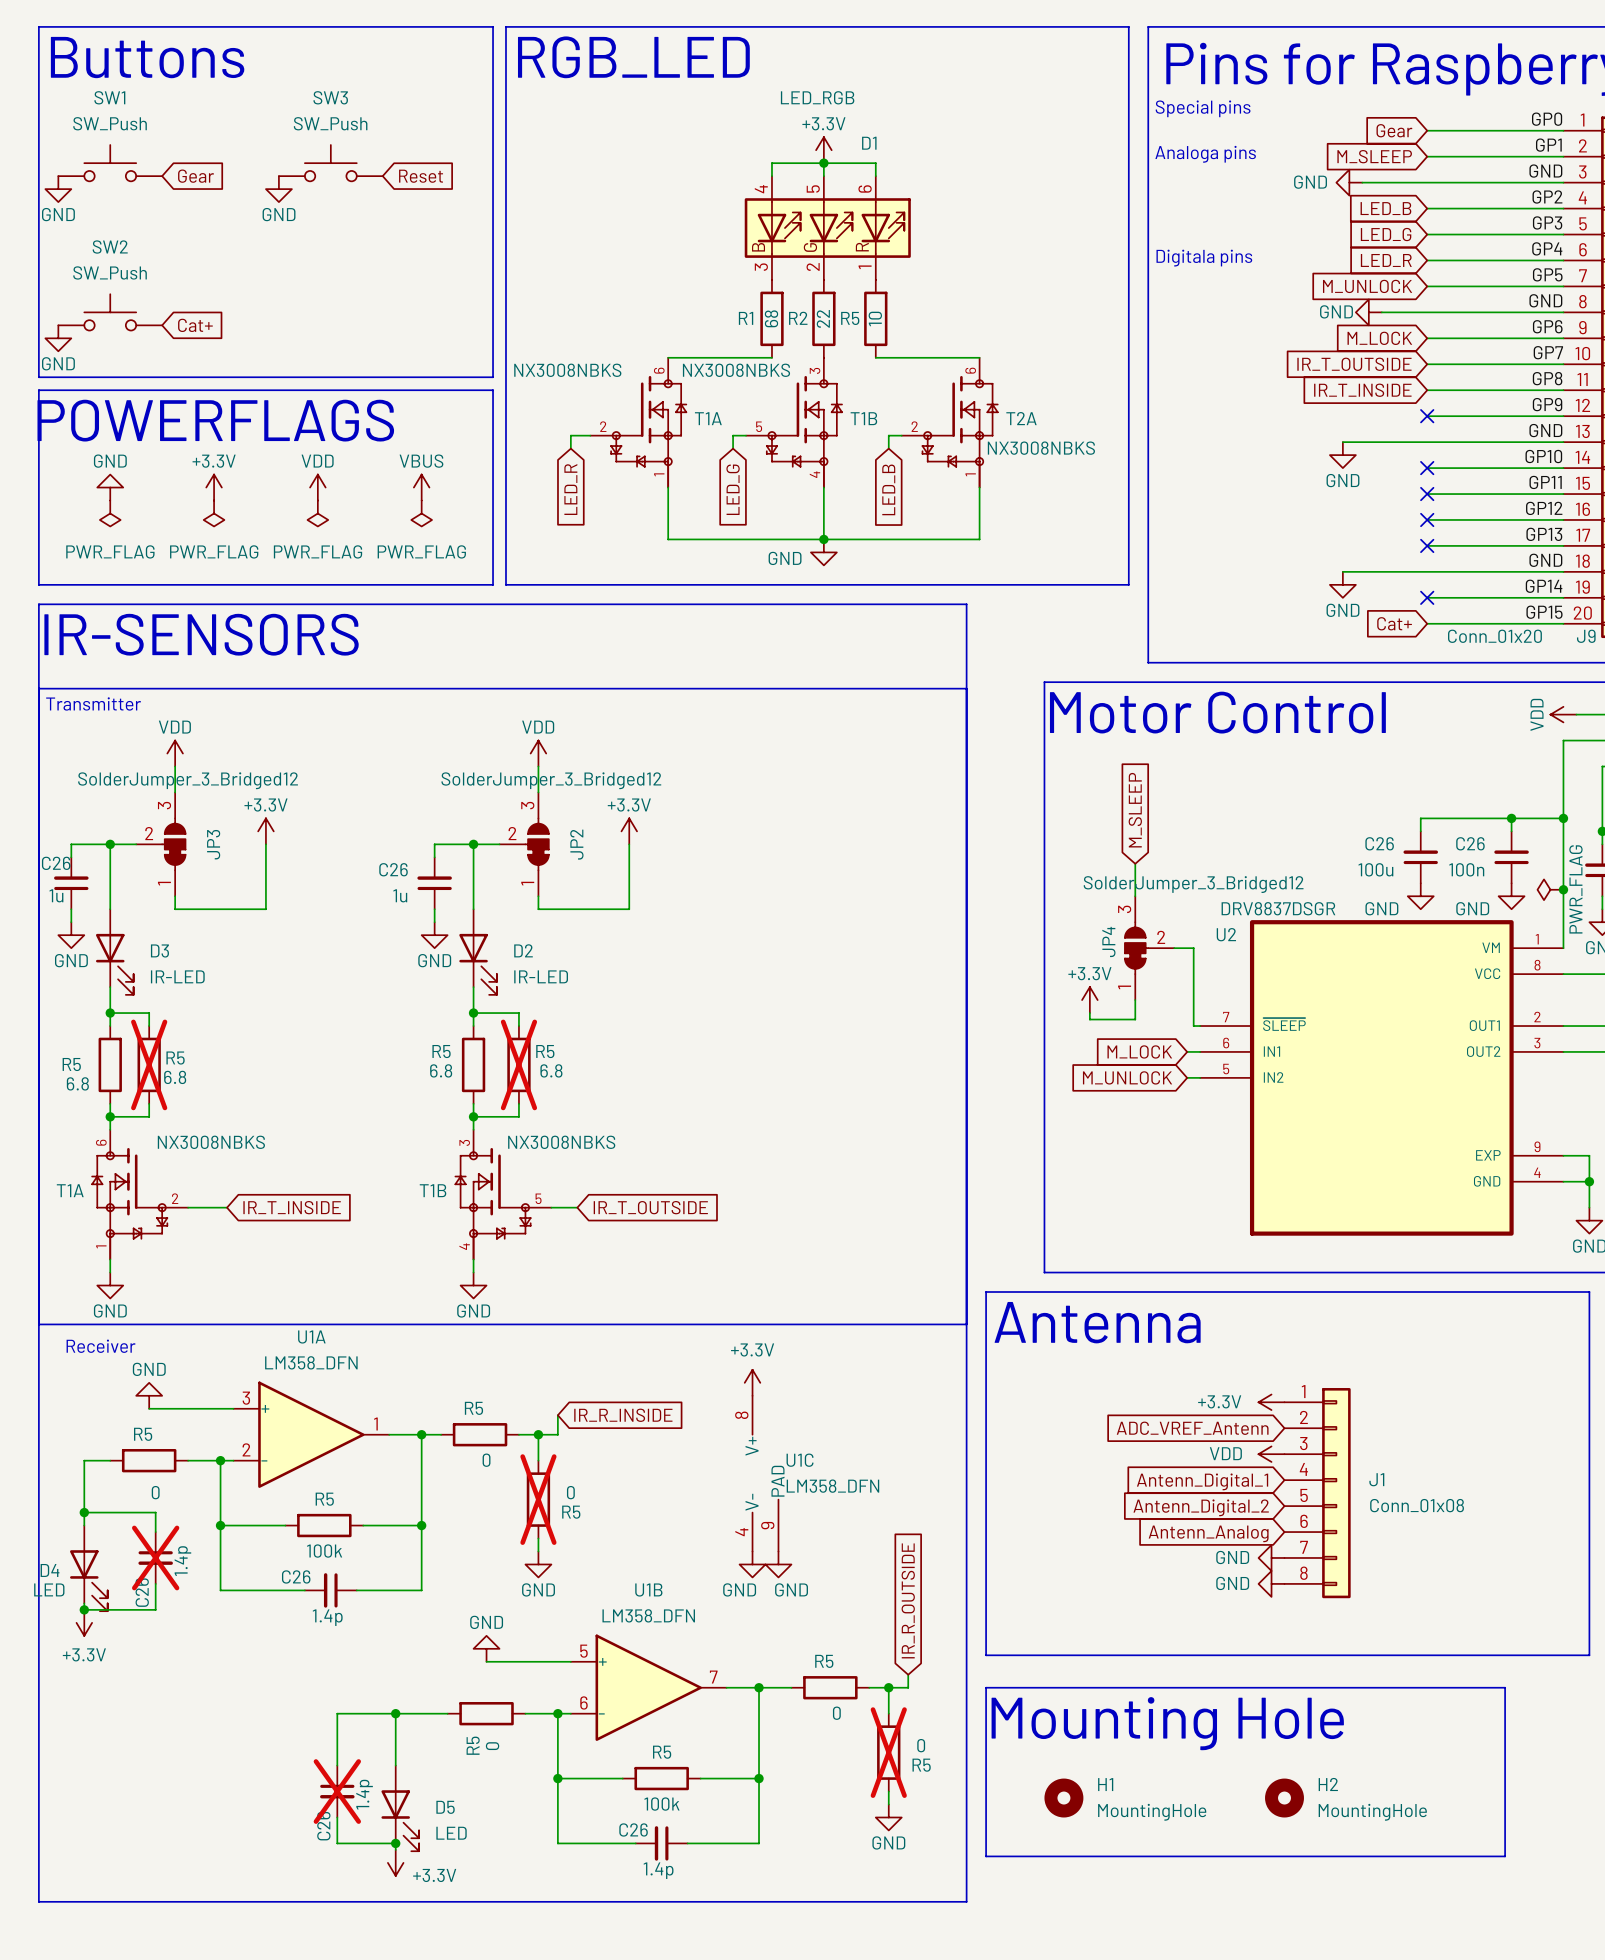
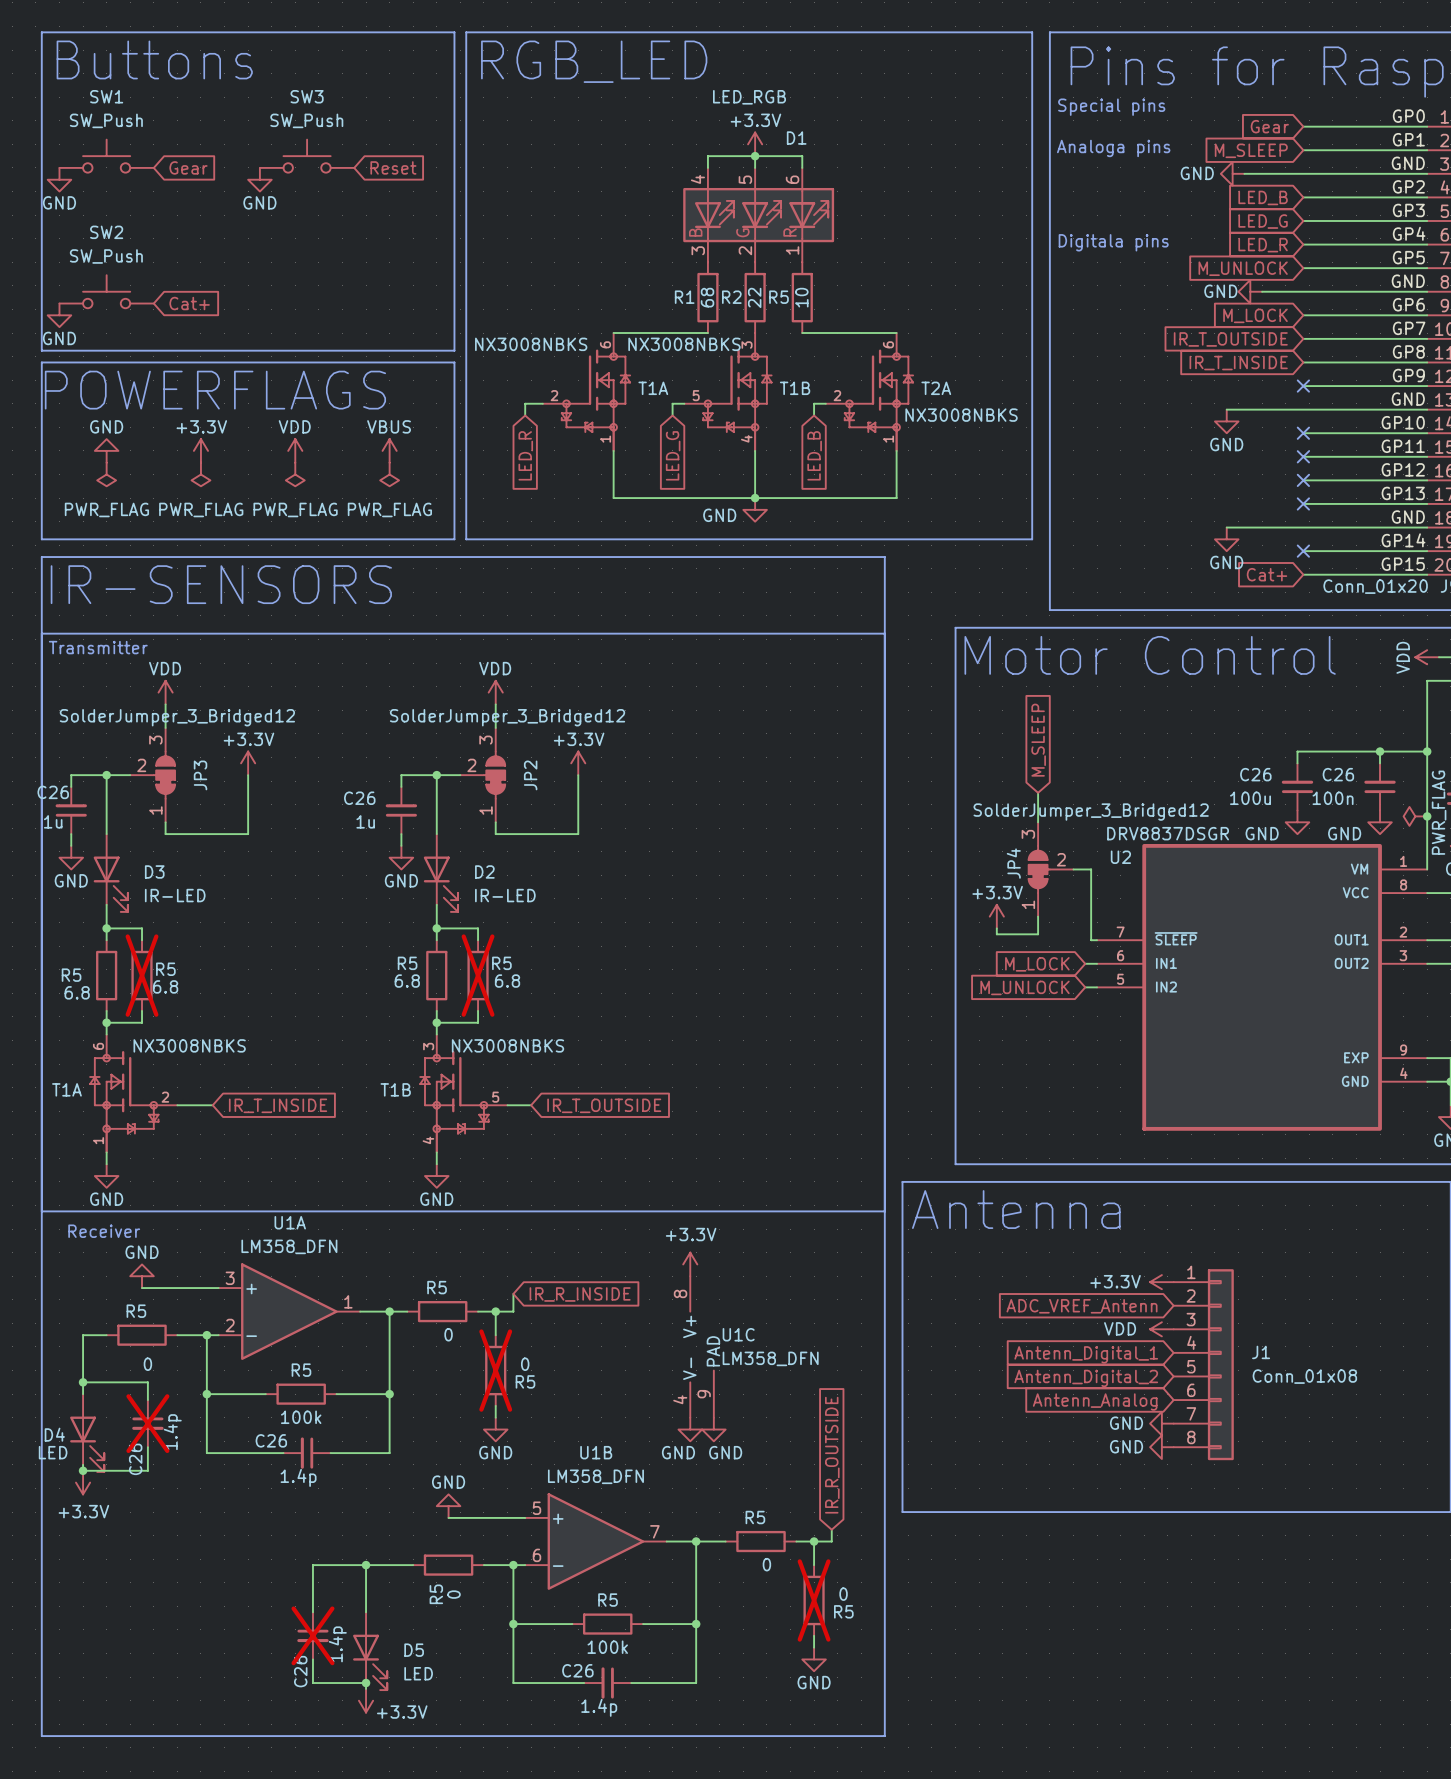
line: (986, 1687) (1505, 1687) (1505, 1856) (986, 1856) (986, 1687) -> none
text: Mounting Hole (1167, 1723) -> none
H1: MountingHole (1063, 1798) -> none
H2: MountingHole (1284, 1798) -> none

